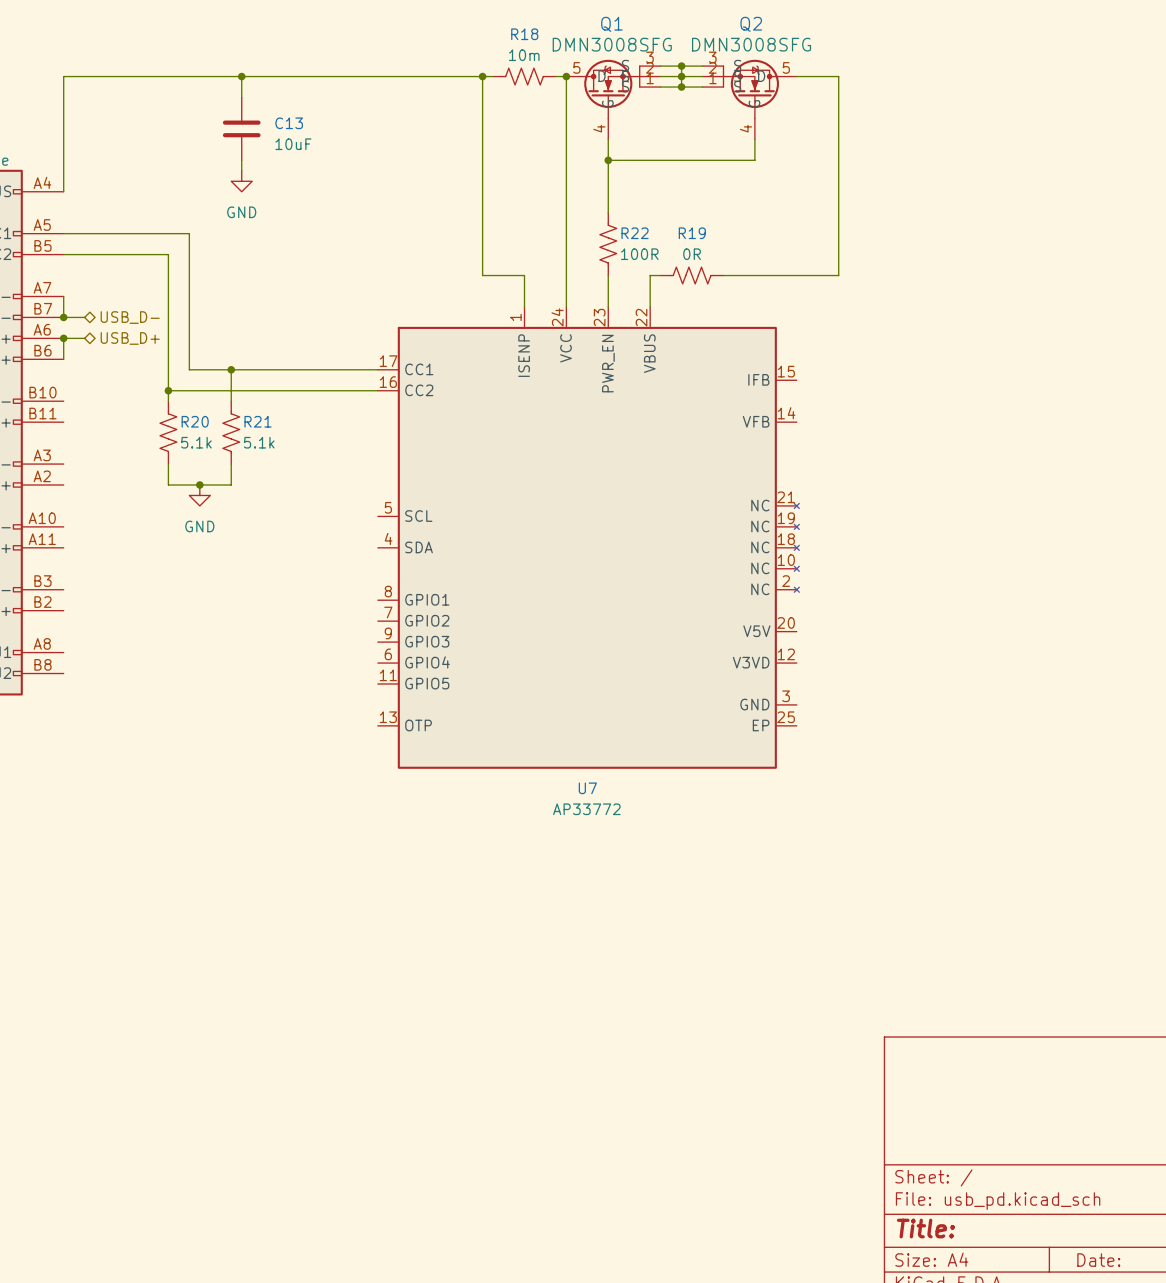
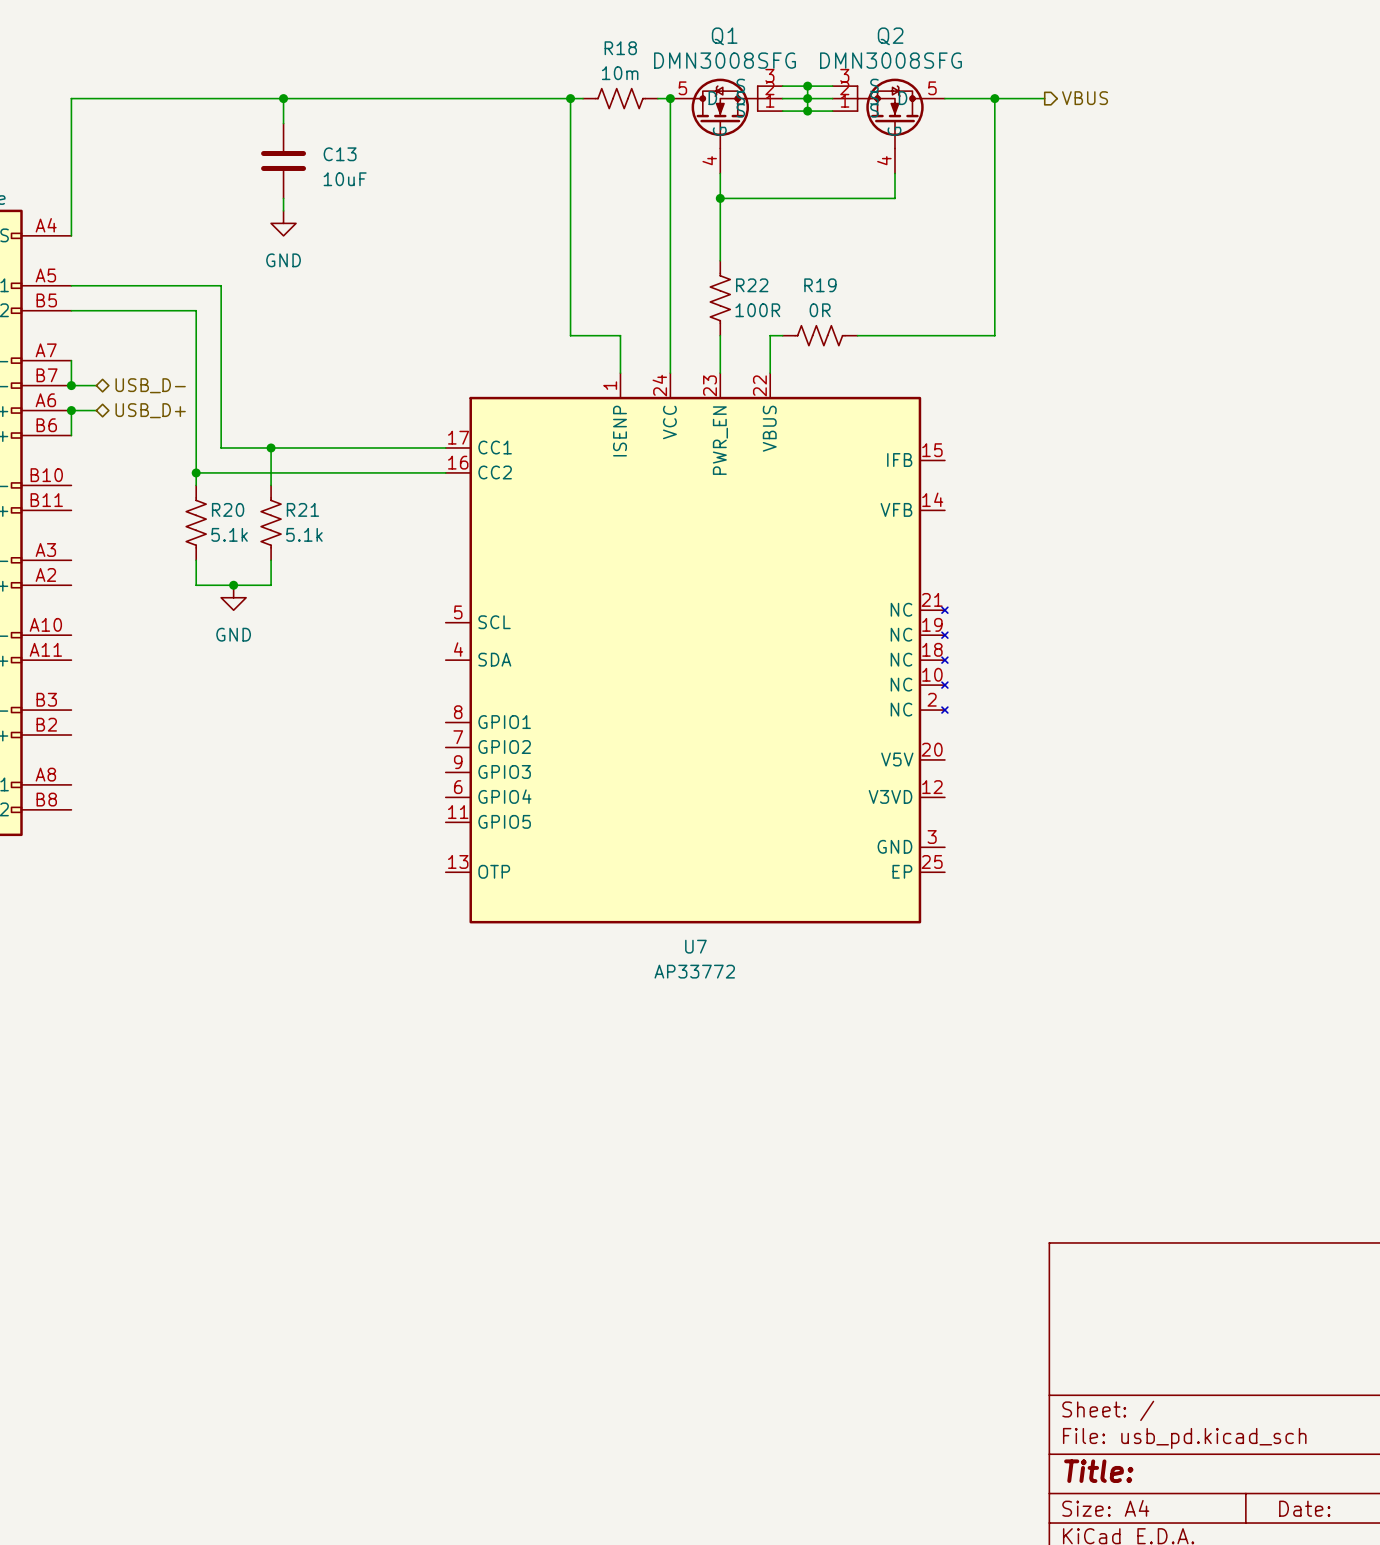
wire: none -> (994, 98) (1044, 98)
junction: none -> (994, 98)
hierarchical label: none -> VBUS (1085, 98)

